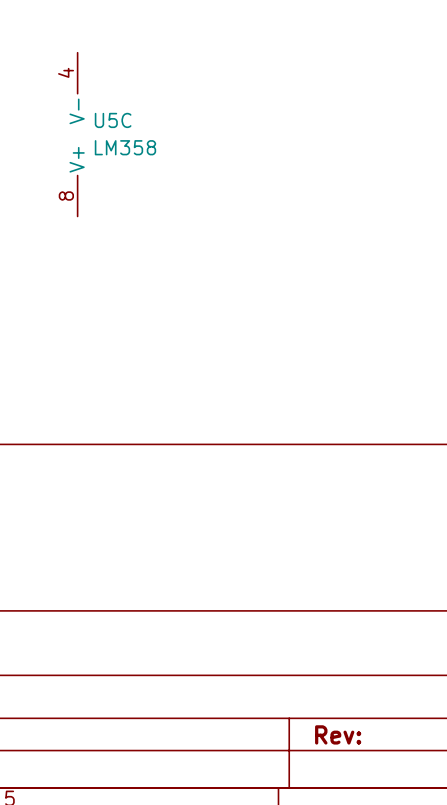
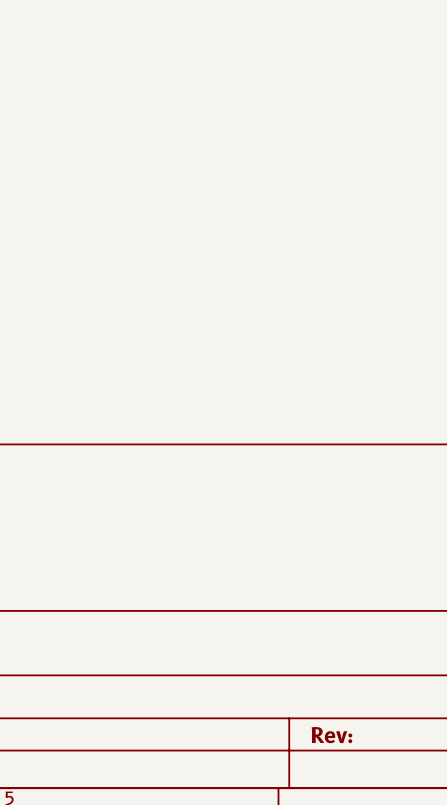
U5C: LM358 (77, 134) -> none

